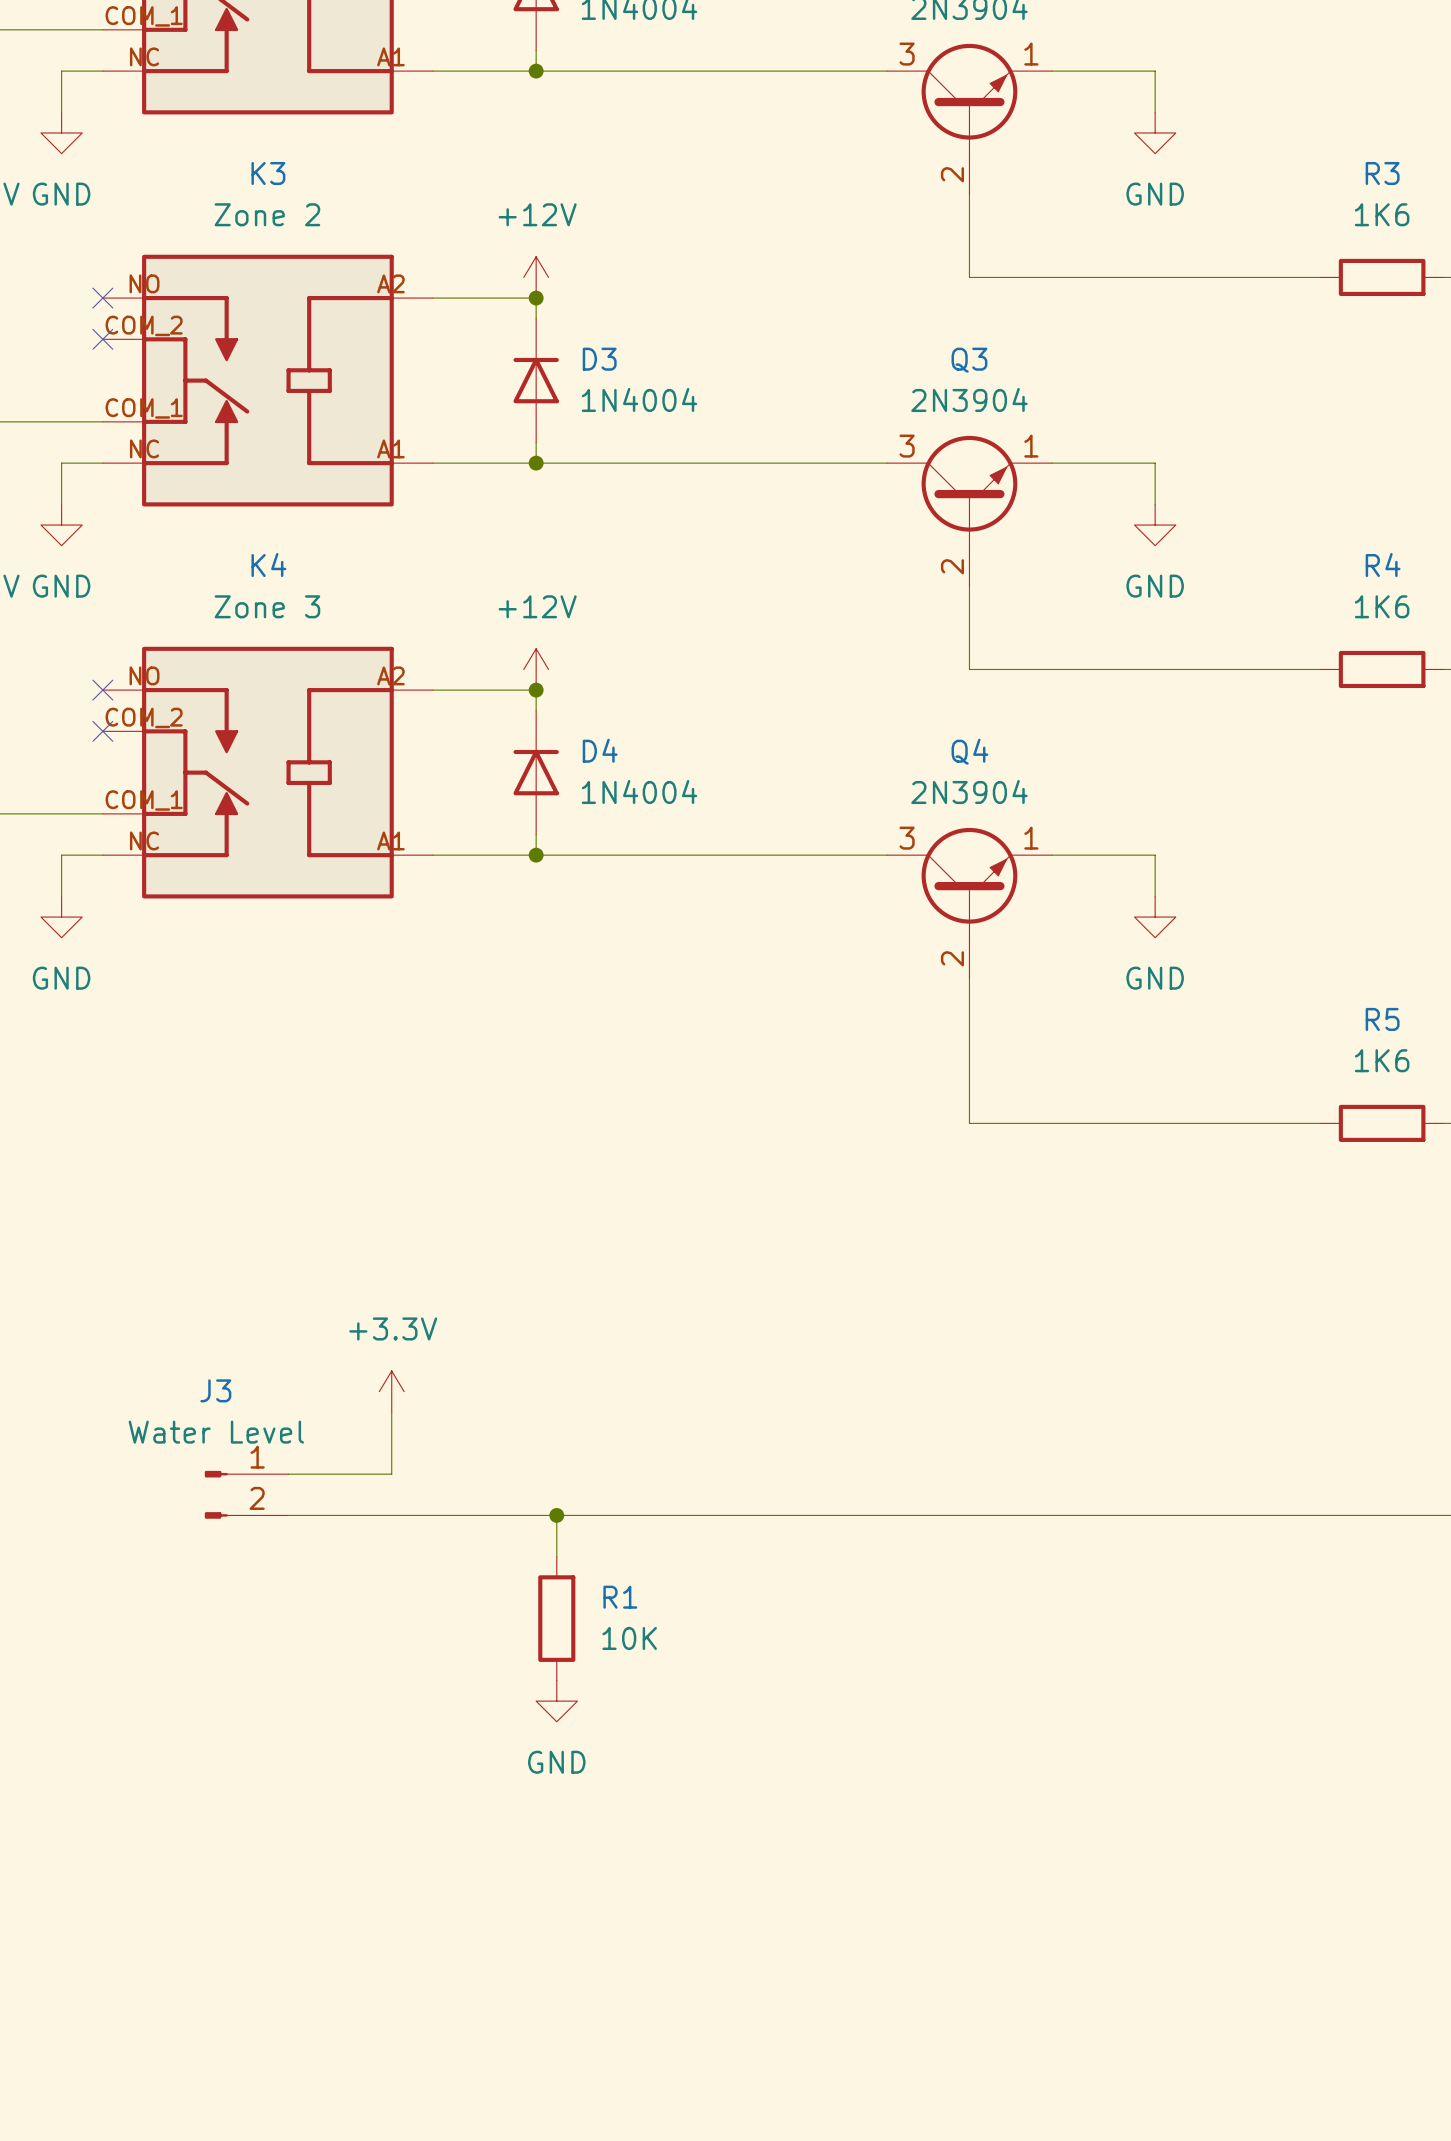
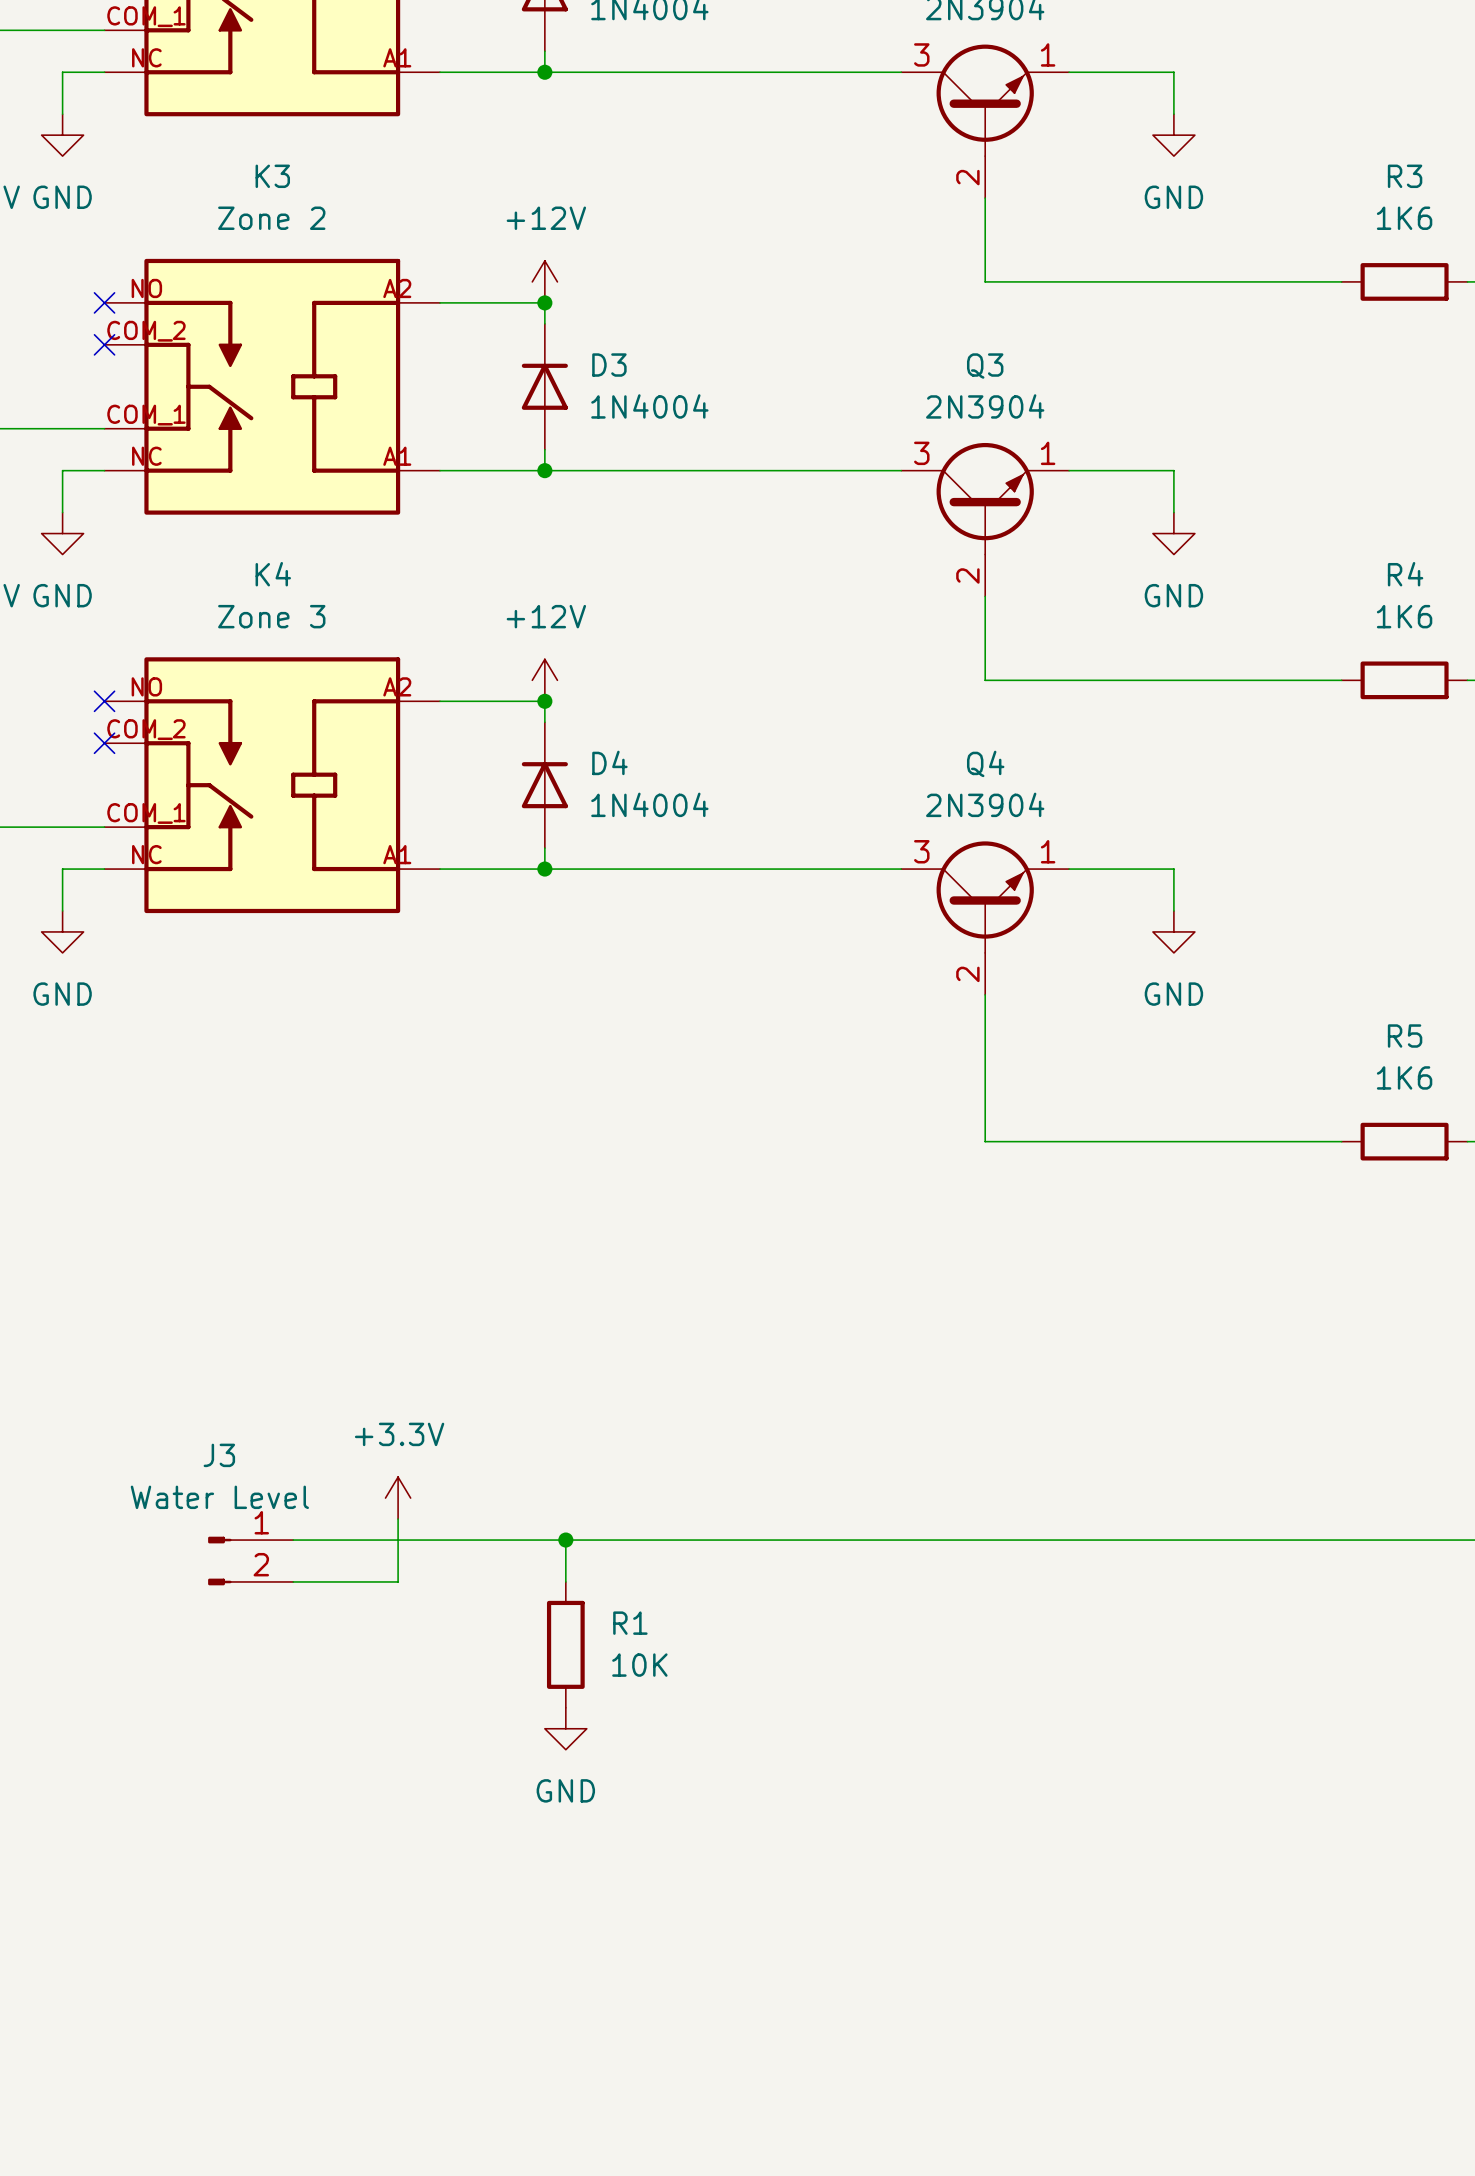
power symbol position: +3.3V (391, 1391) -> +3.3V (398, 1498)
wire: (391, 1412) (391, 1474) (288, 1474) -> (398, 1519) (398, 1581) (293, 1581)
J3 position: (246, 1494) -> (250, 1561)

